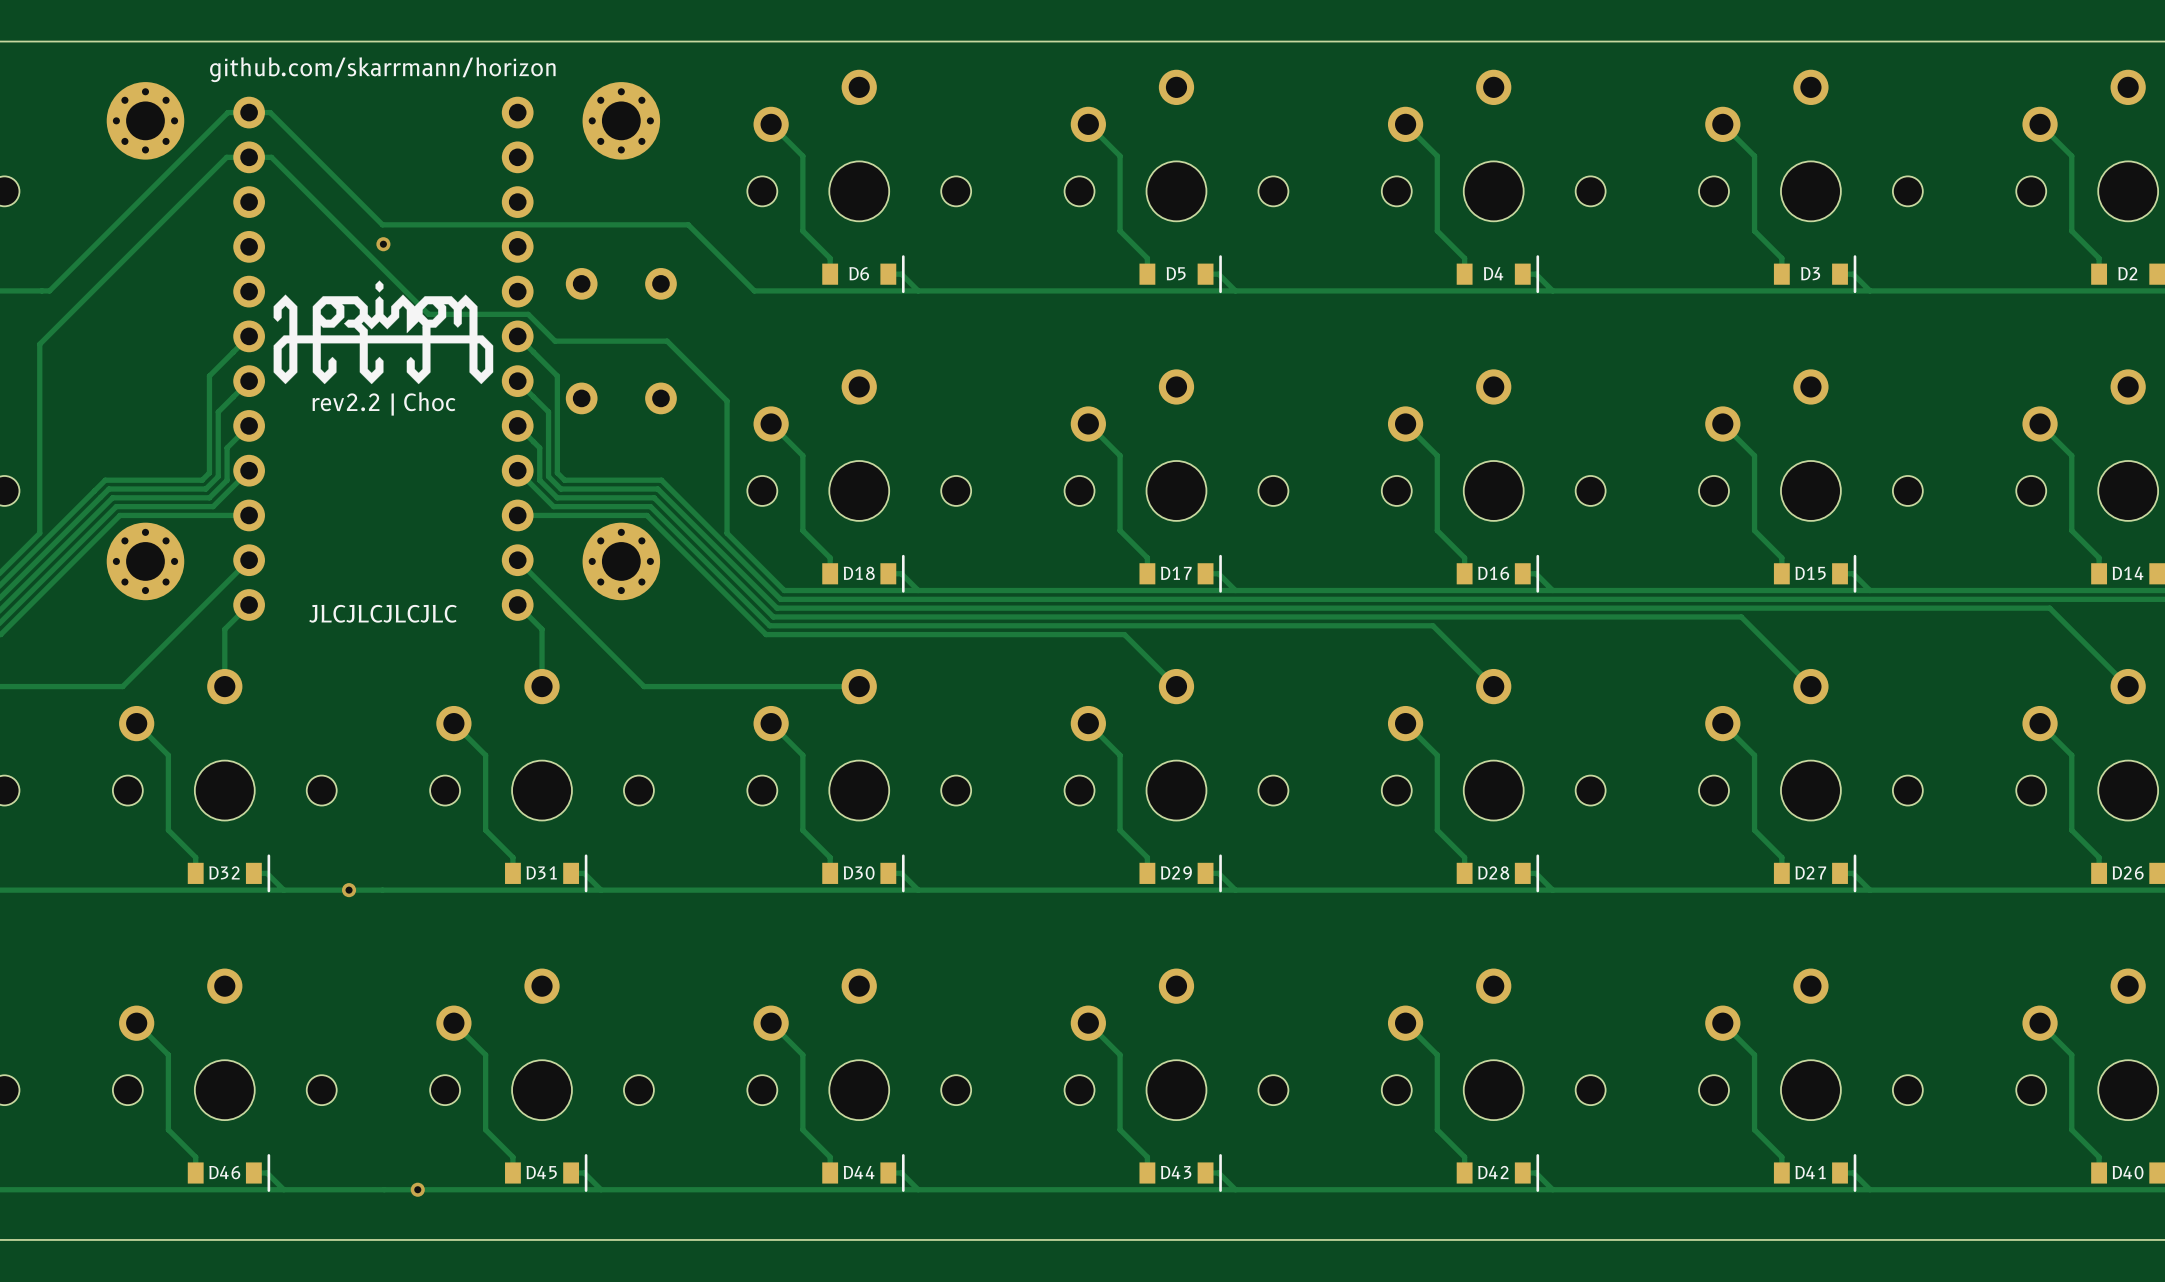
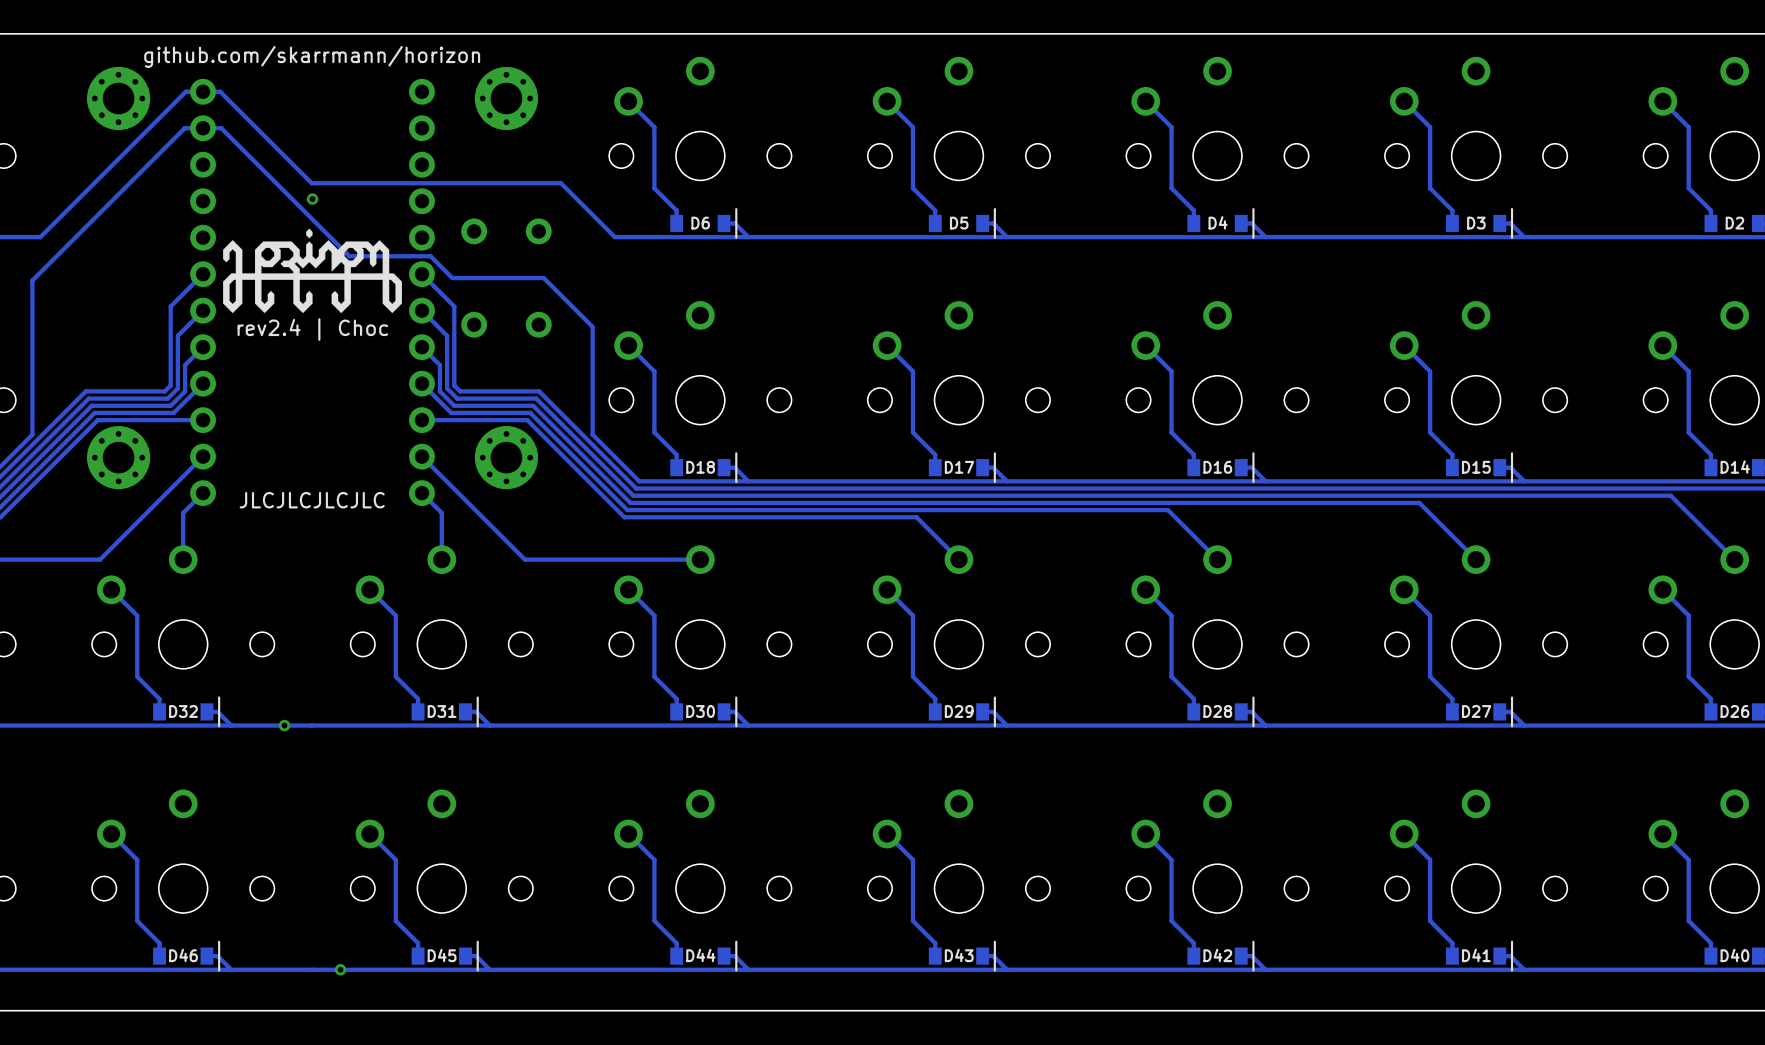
text: rev2.2 | Choc (384, 403) -> rev2.4 | Choc (312, 329)

